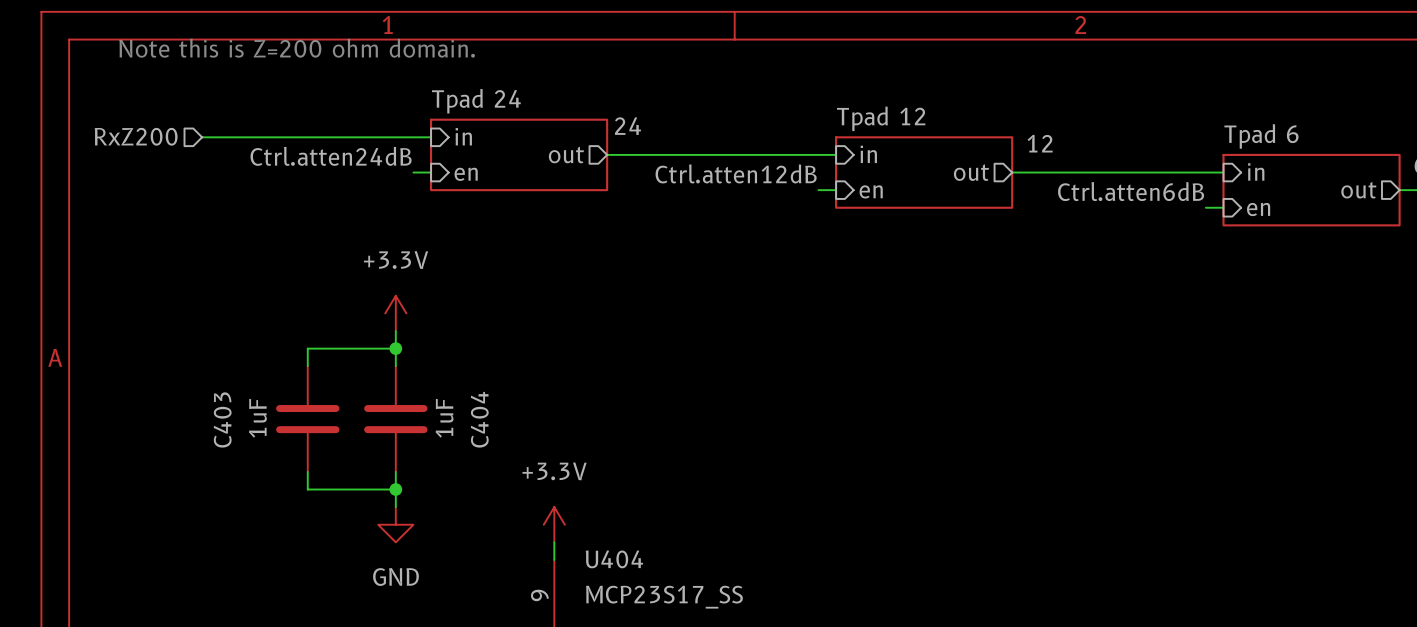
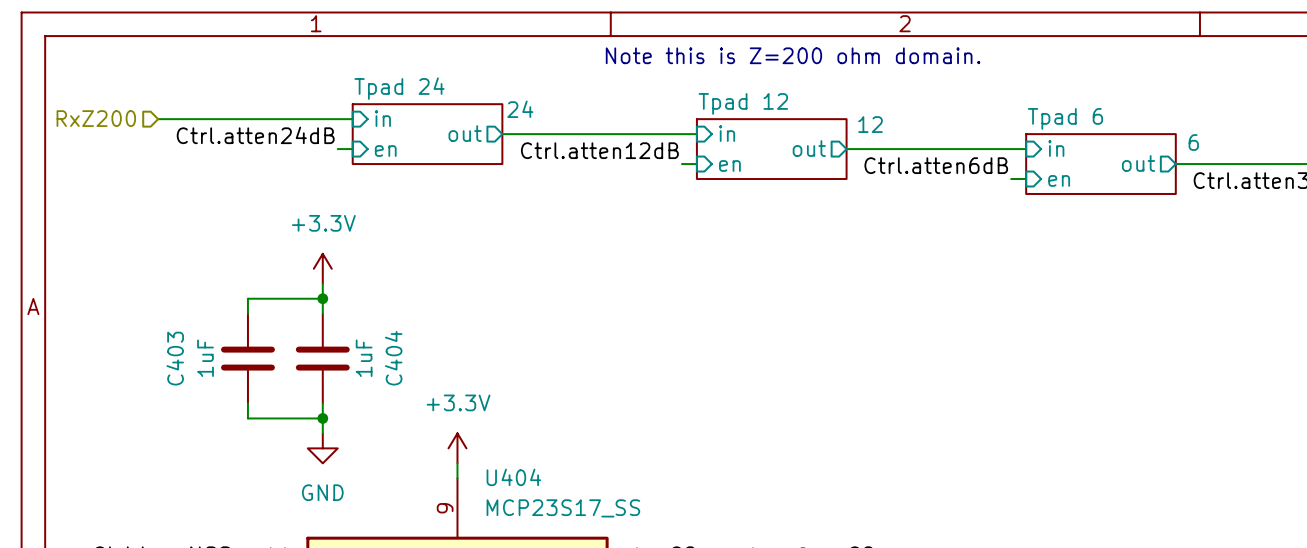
text: Note this is Z=200 ohm domain. (297, 48) -> none
text: none -> Note this is Z=200 ohm domain. (793, 55)

